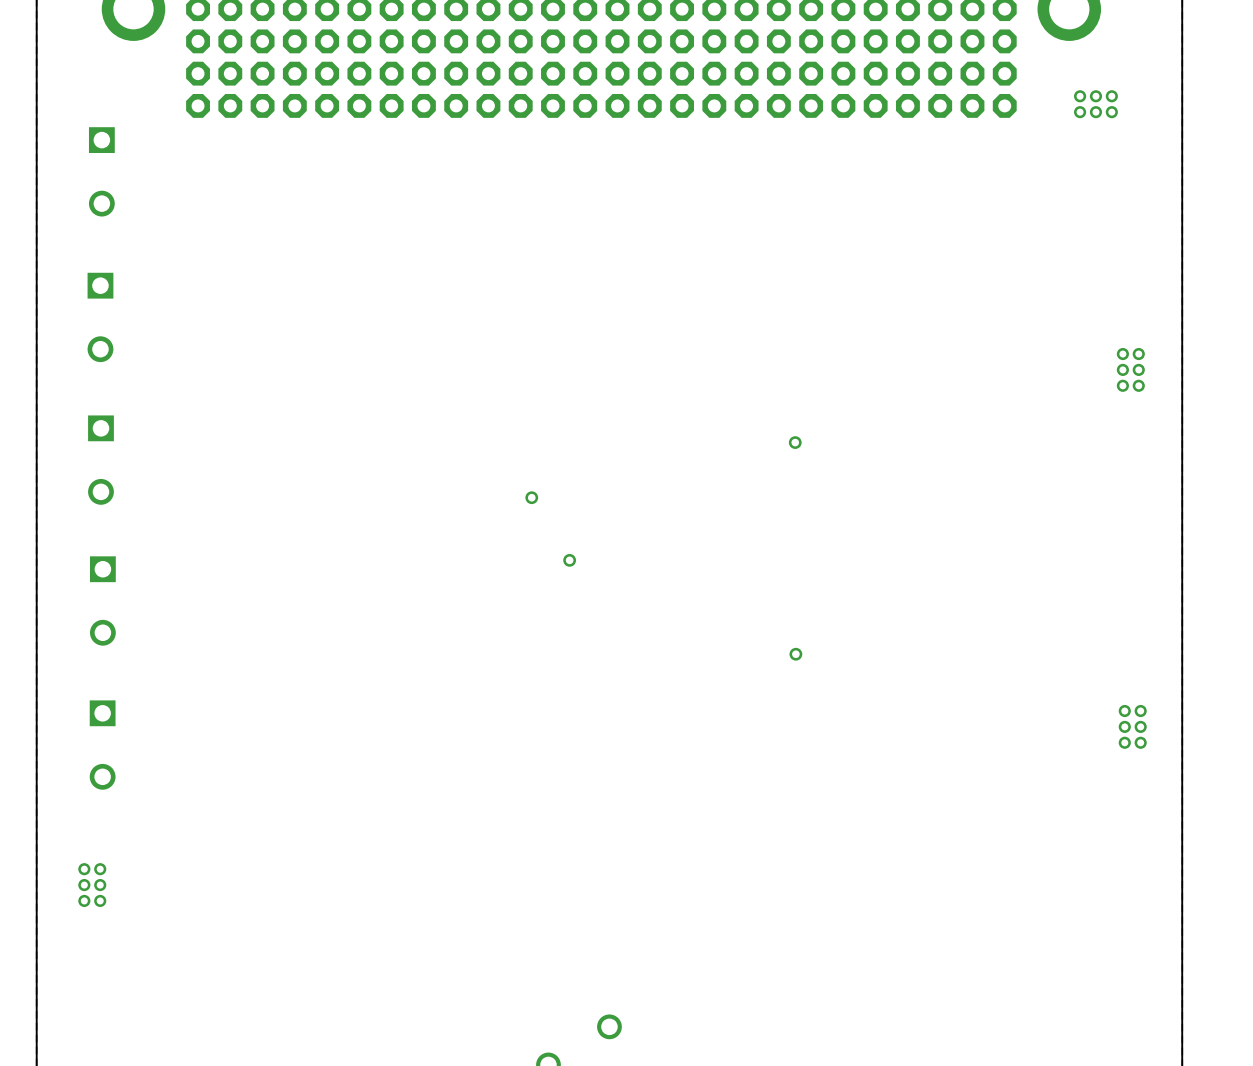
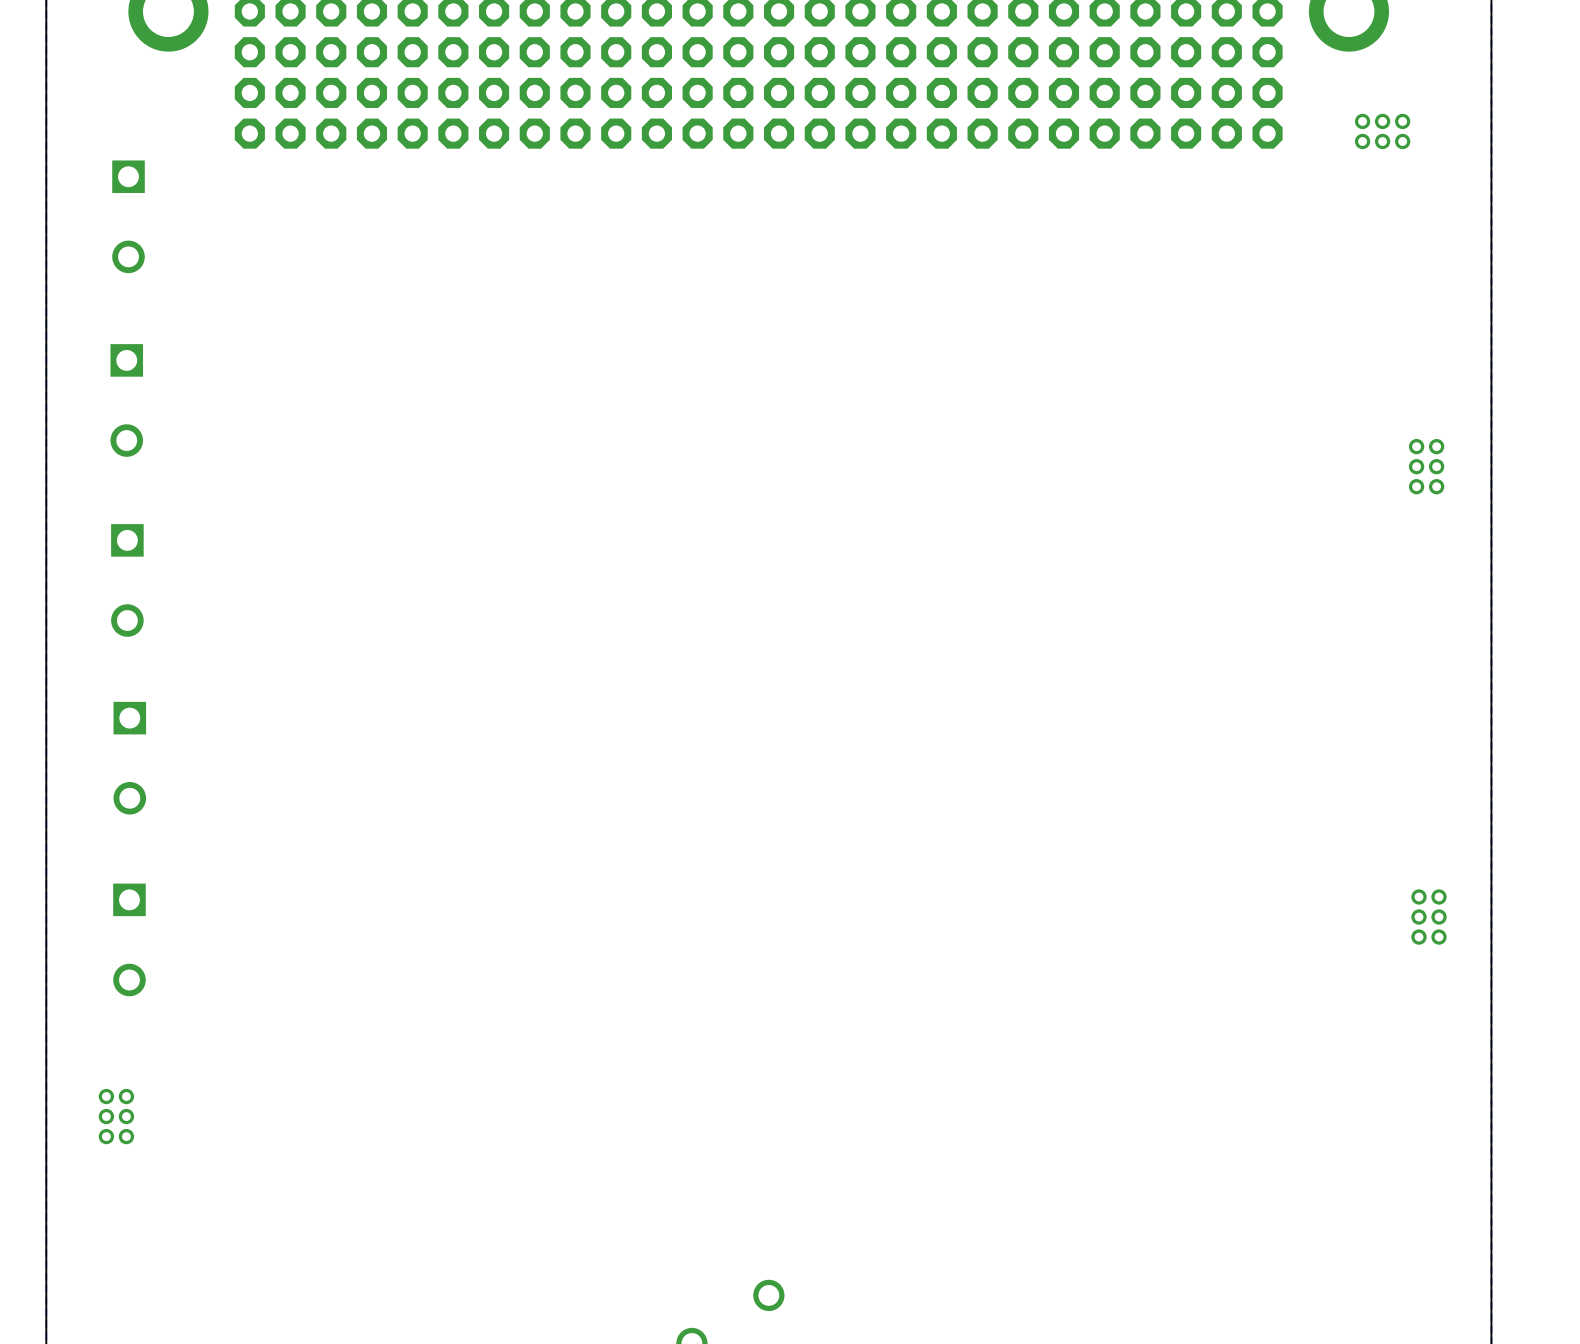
via: (795, 442) -> none
via: (531, 497) -> none
via: (569, 560) -> none
via: (795, 654) -> none

